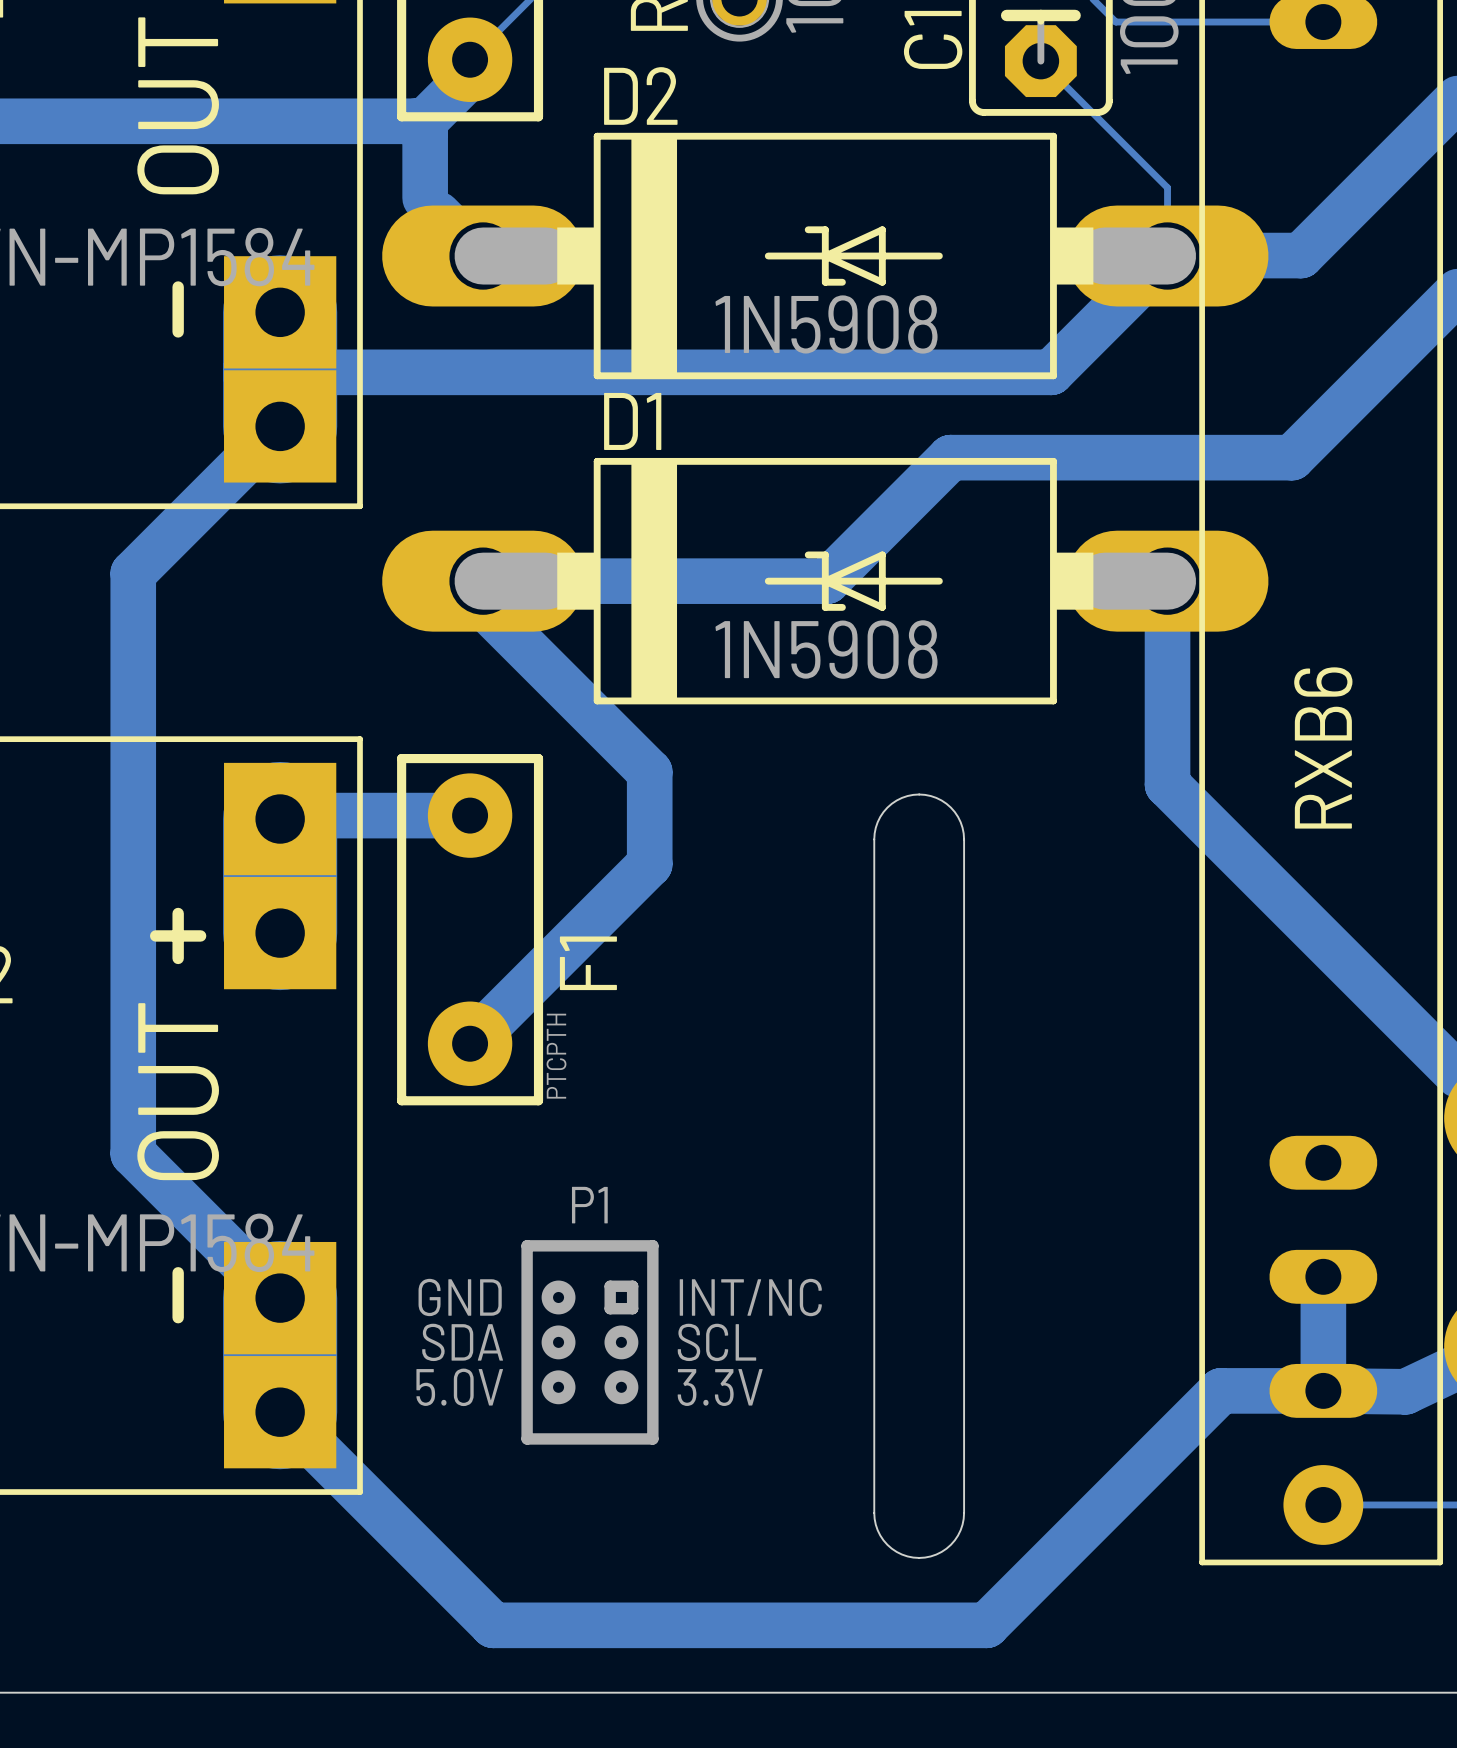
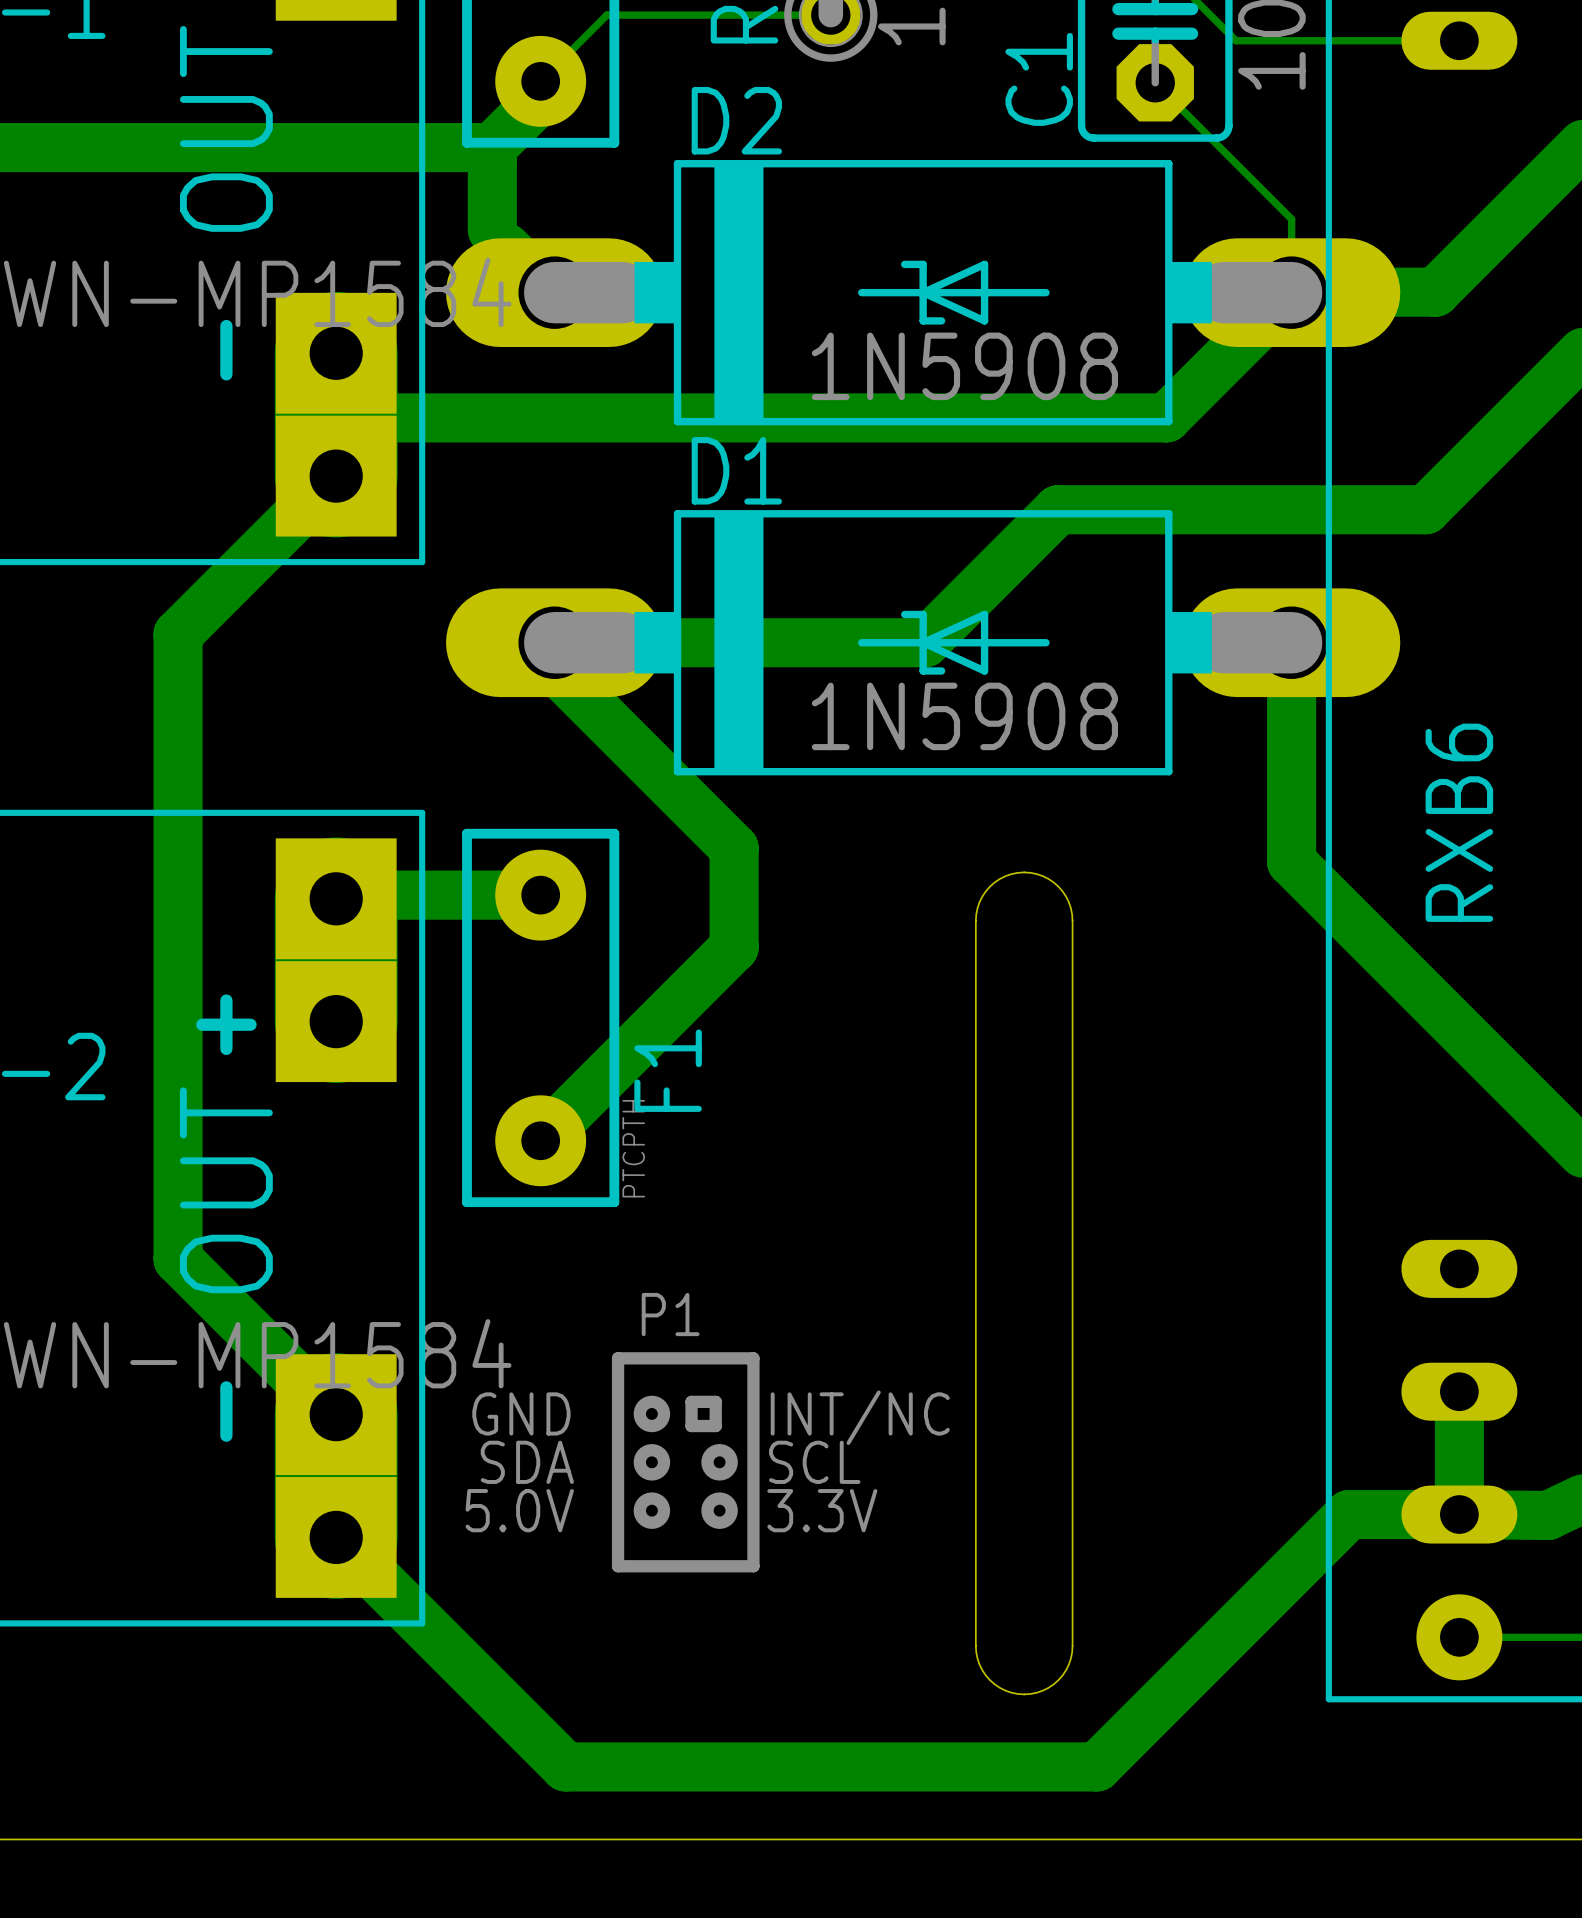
line: (541, 1245) (527, 1245) (527, 1438) (541, 1438) -> (618, 1358) (618, 1566)
line: (652, 1245) (652, 1438) -> (737, 1358) (753, 1358) (753, 1566) (737, 1566)
drawing position: (558, 1297) -> (651, 1413)
drawing position: (558, 1342) -> (651, 1462)
drawing position: (621, 1342) -> (719, 1462)
drawing position: (558, 1387) -> (651, 1510)
drawing position: (621, 1387) -> (719, 1510)

